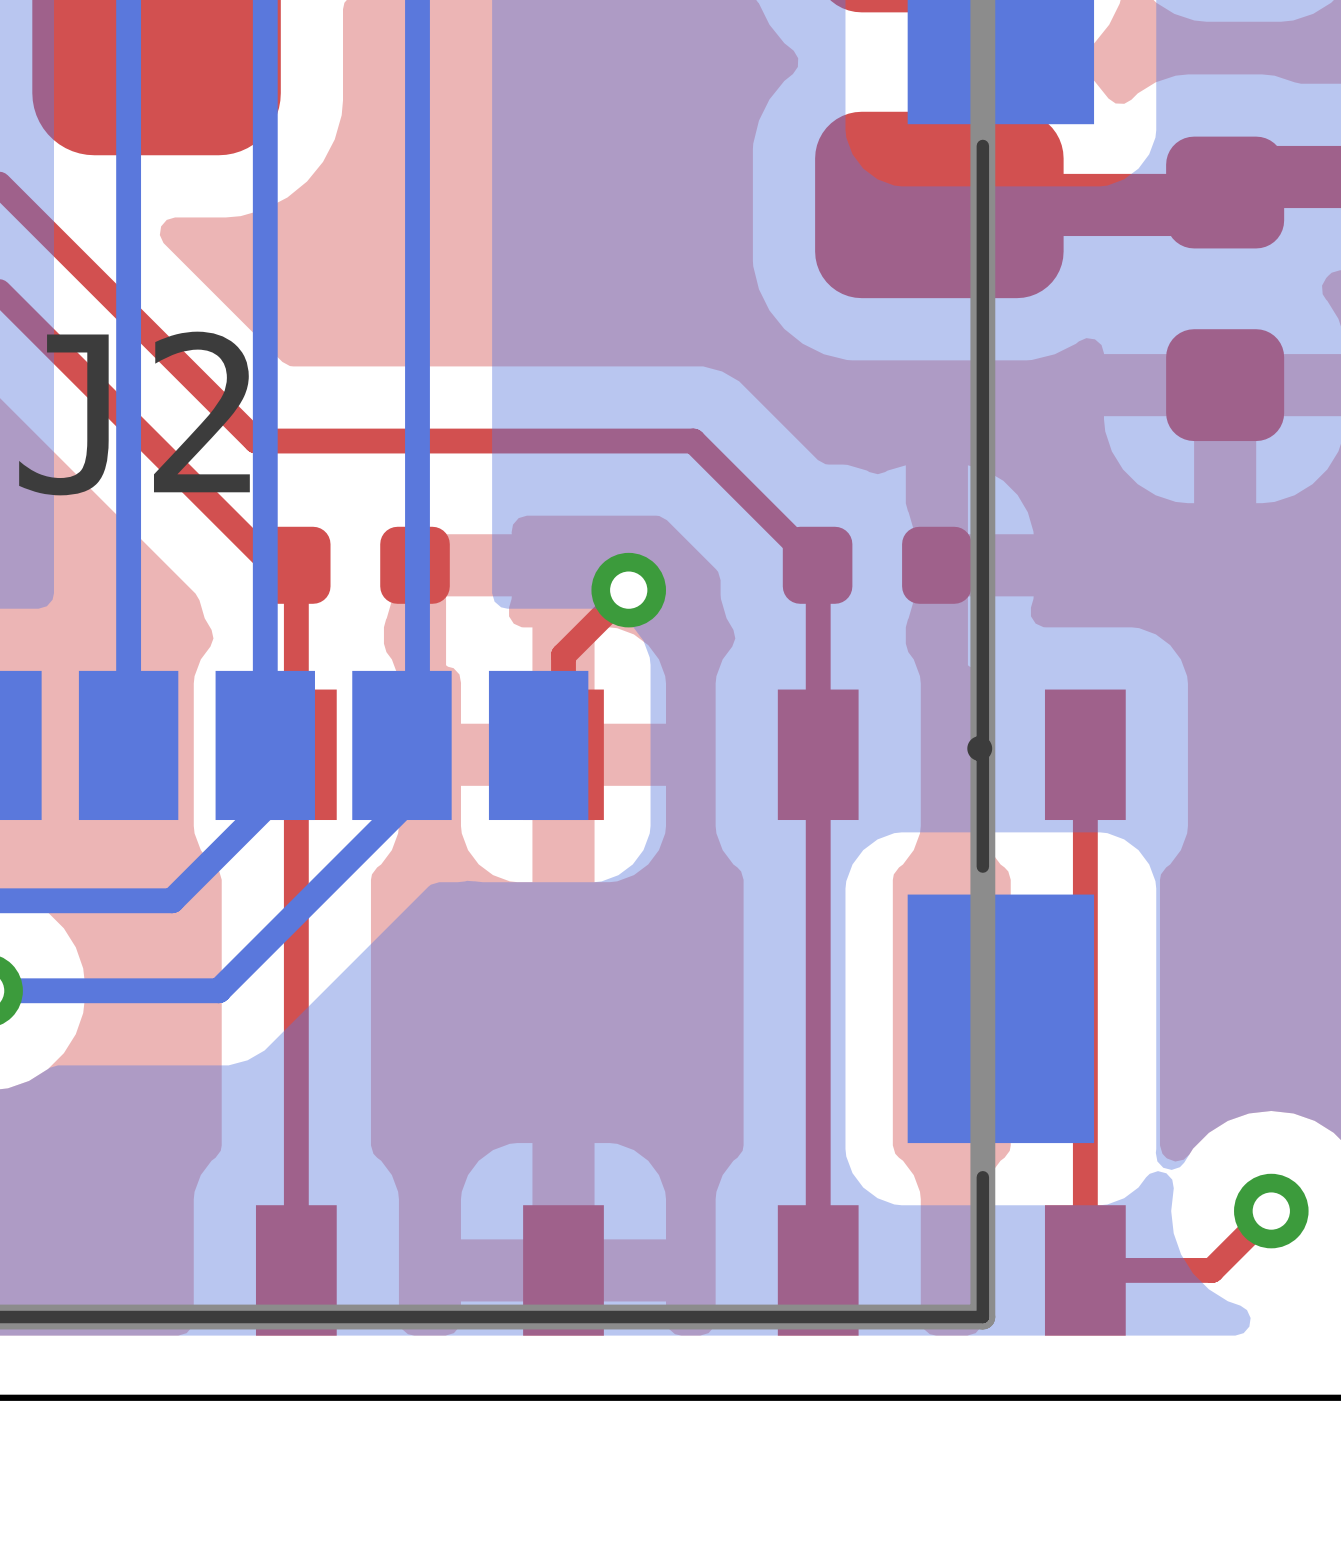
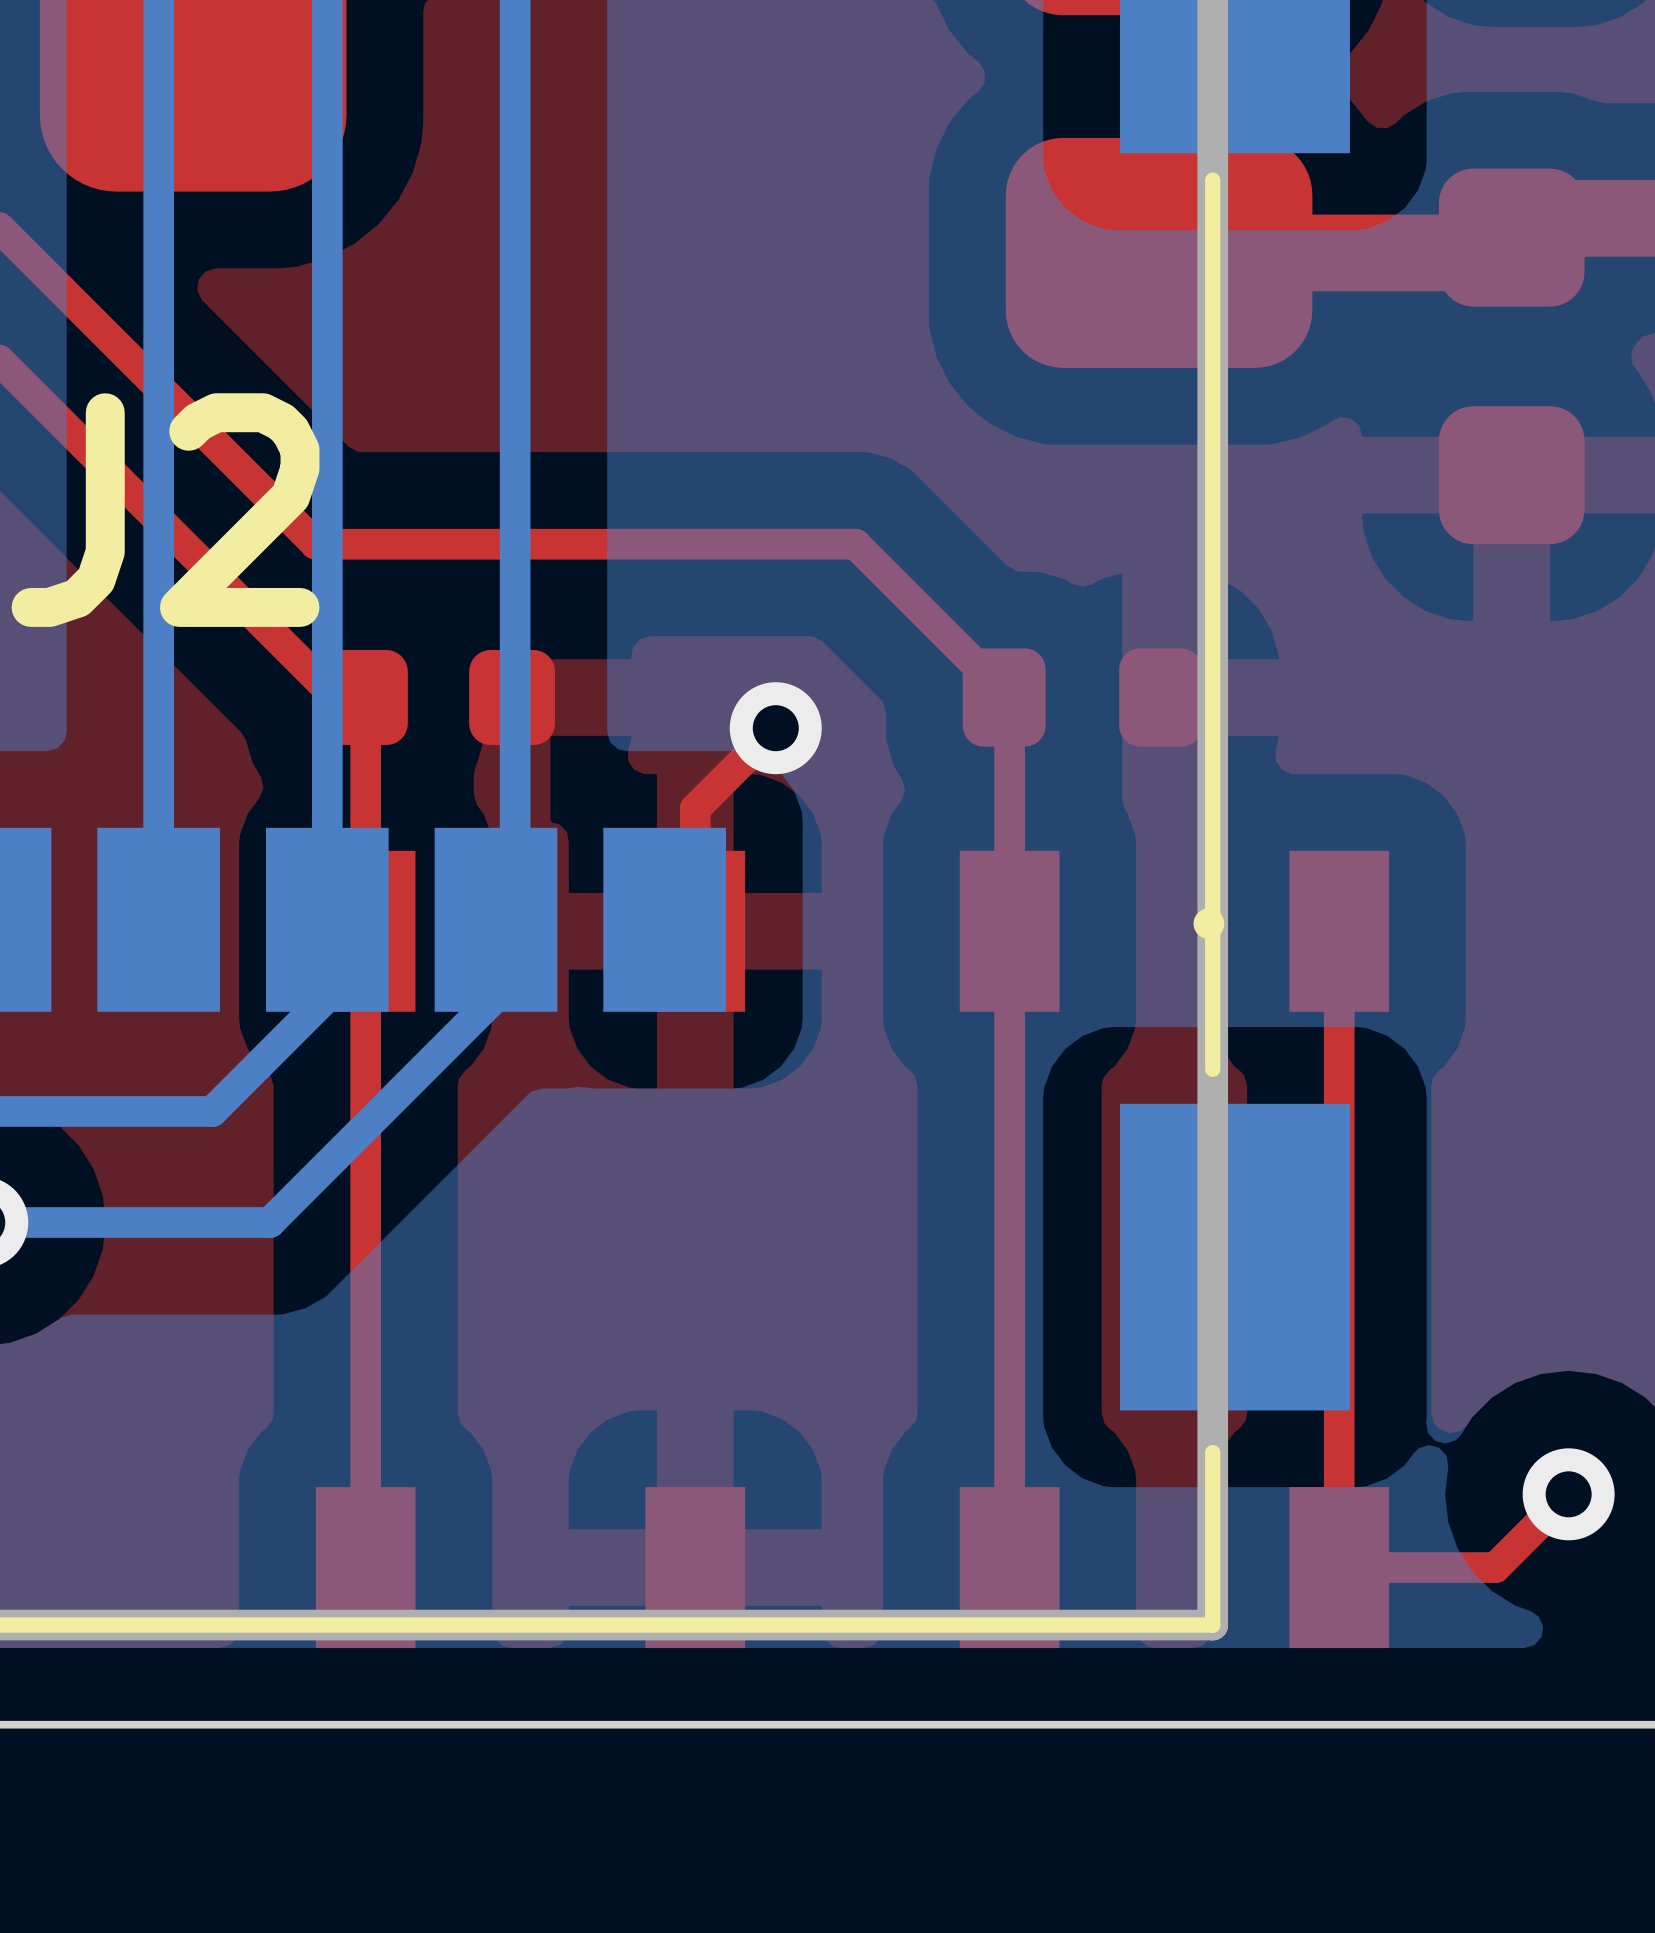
part footprint: [782, 526, 972, 604] -> [962, 648, 1203, 747]

